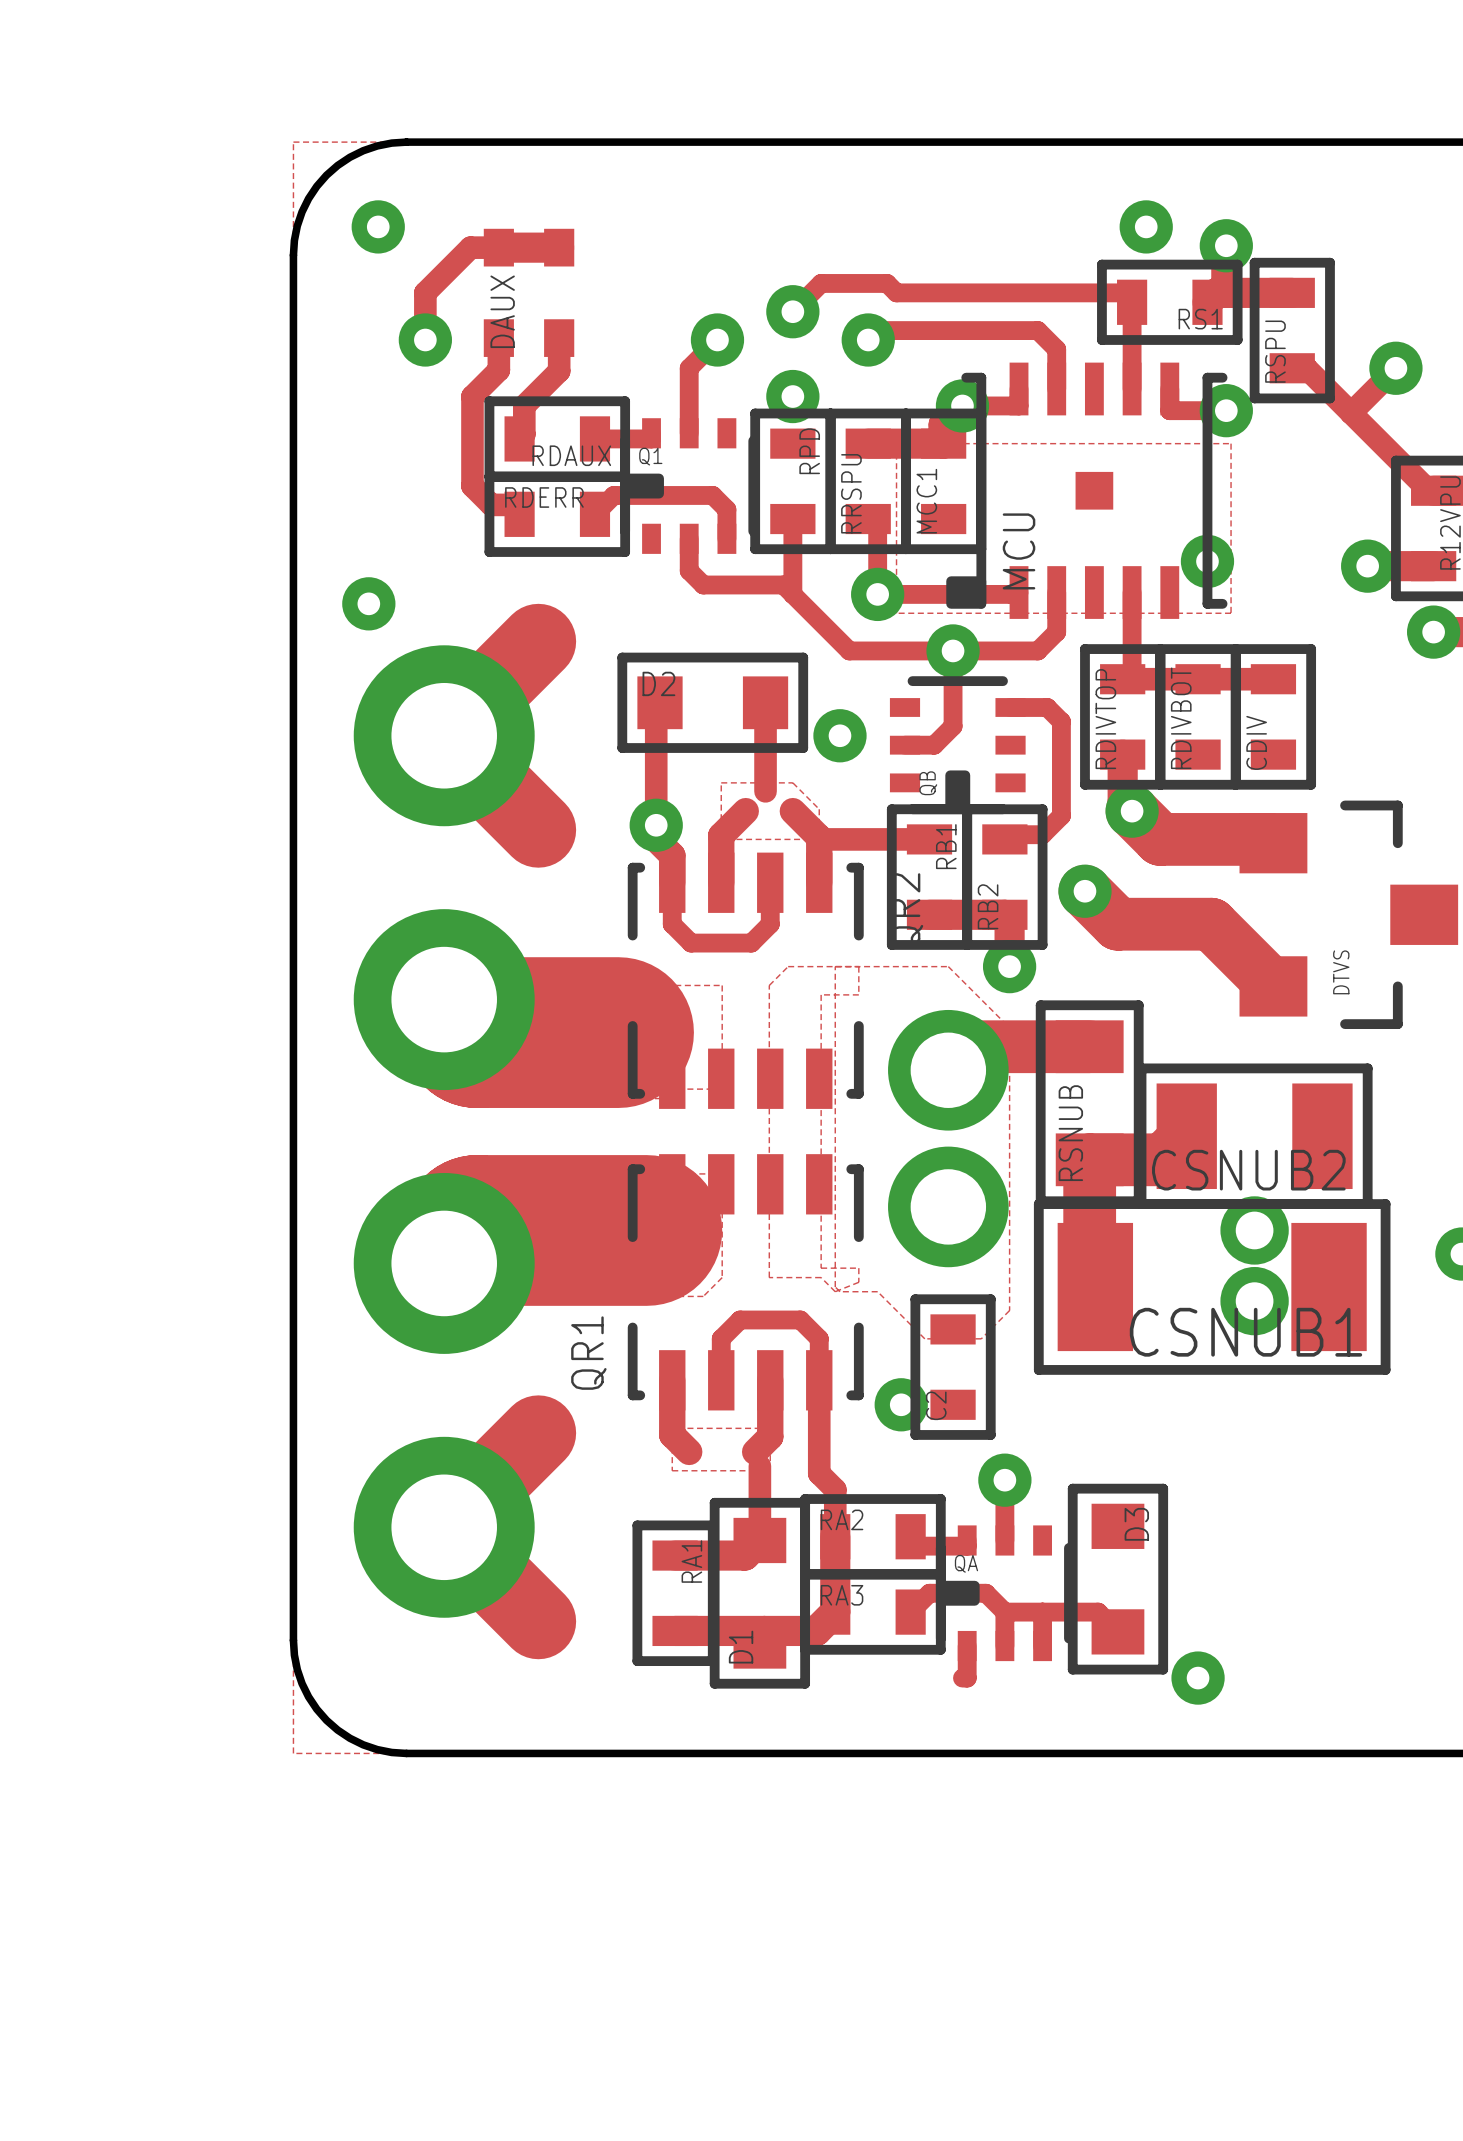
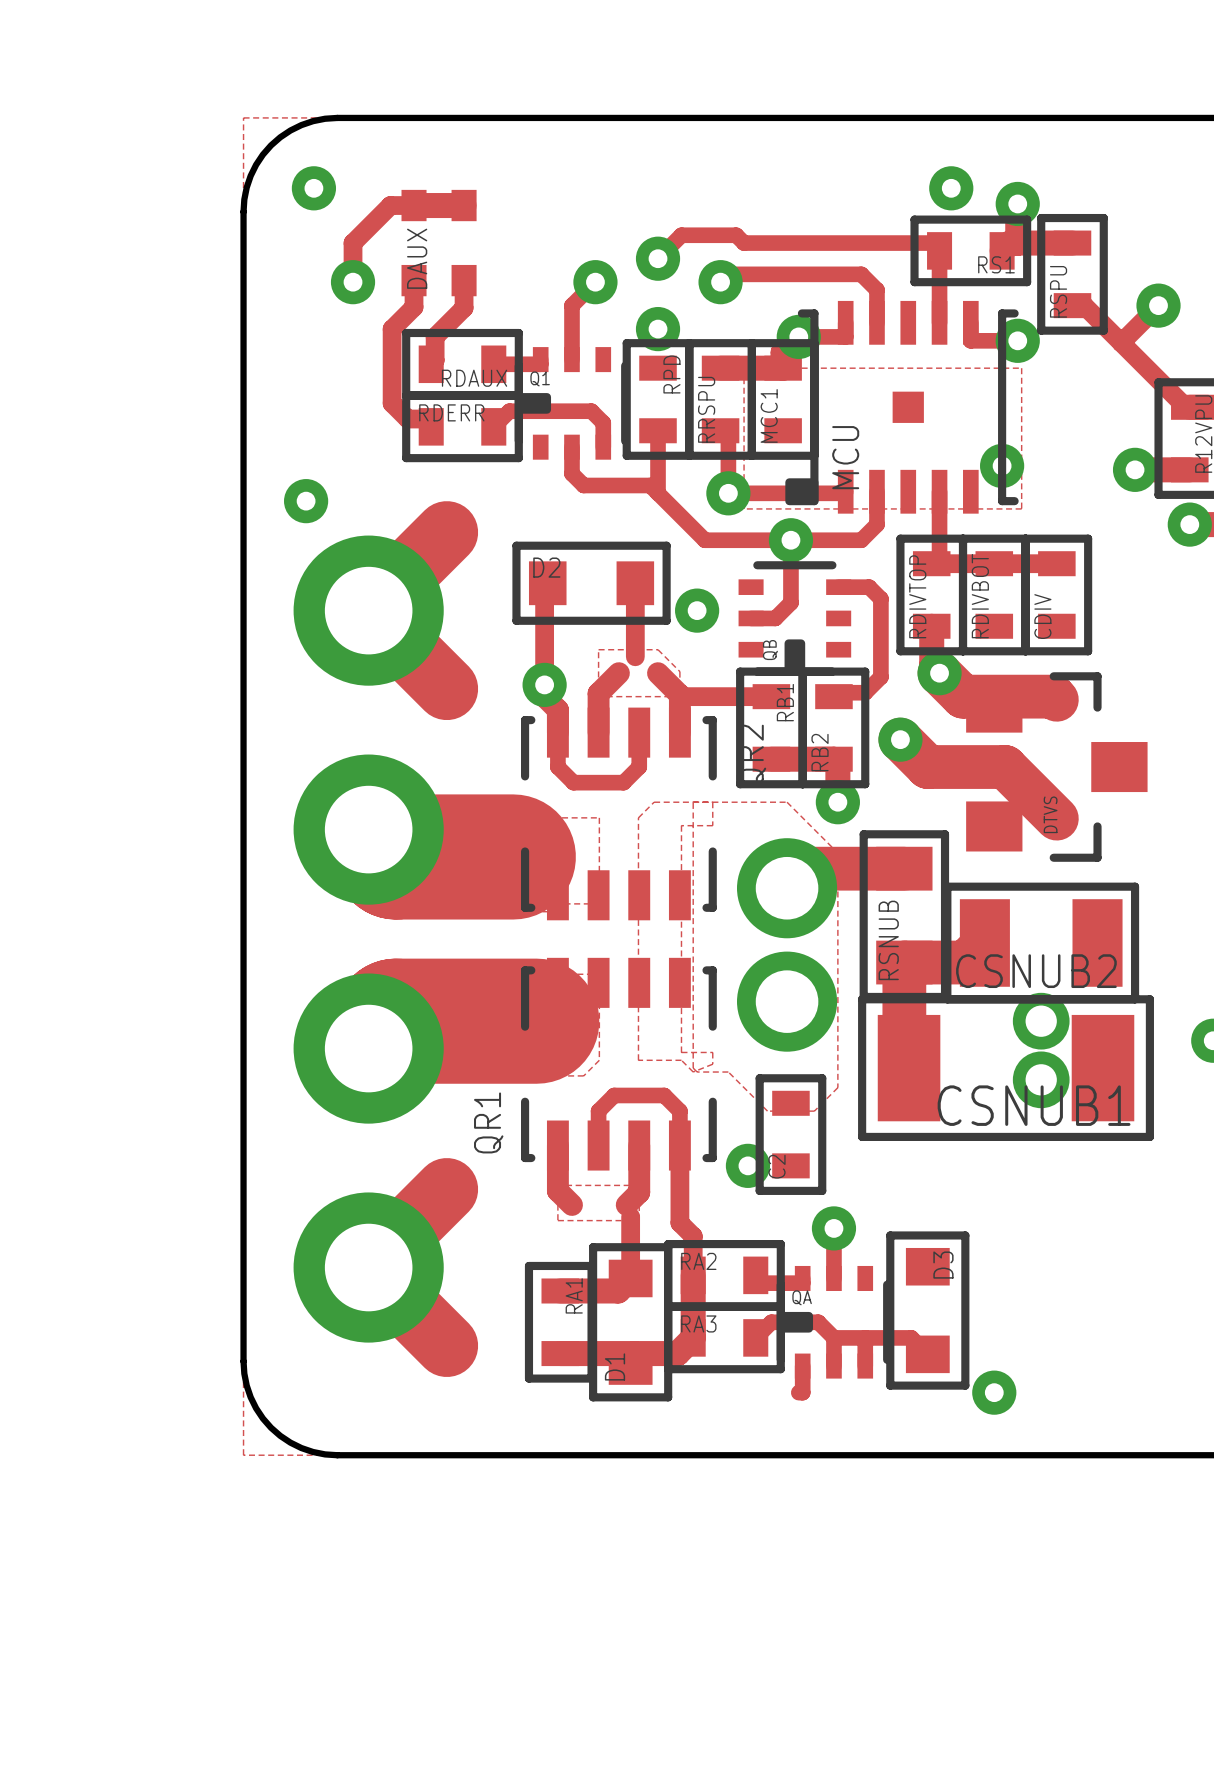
DTVS position: (1348, 914) -> (1056, 767)

